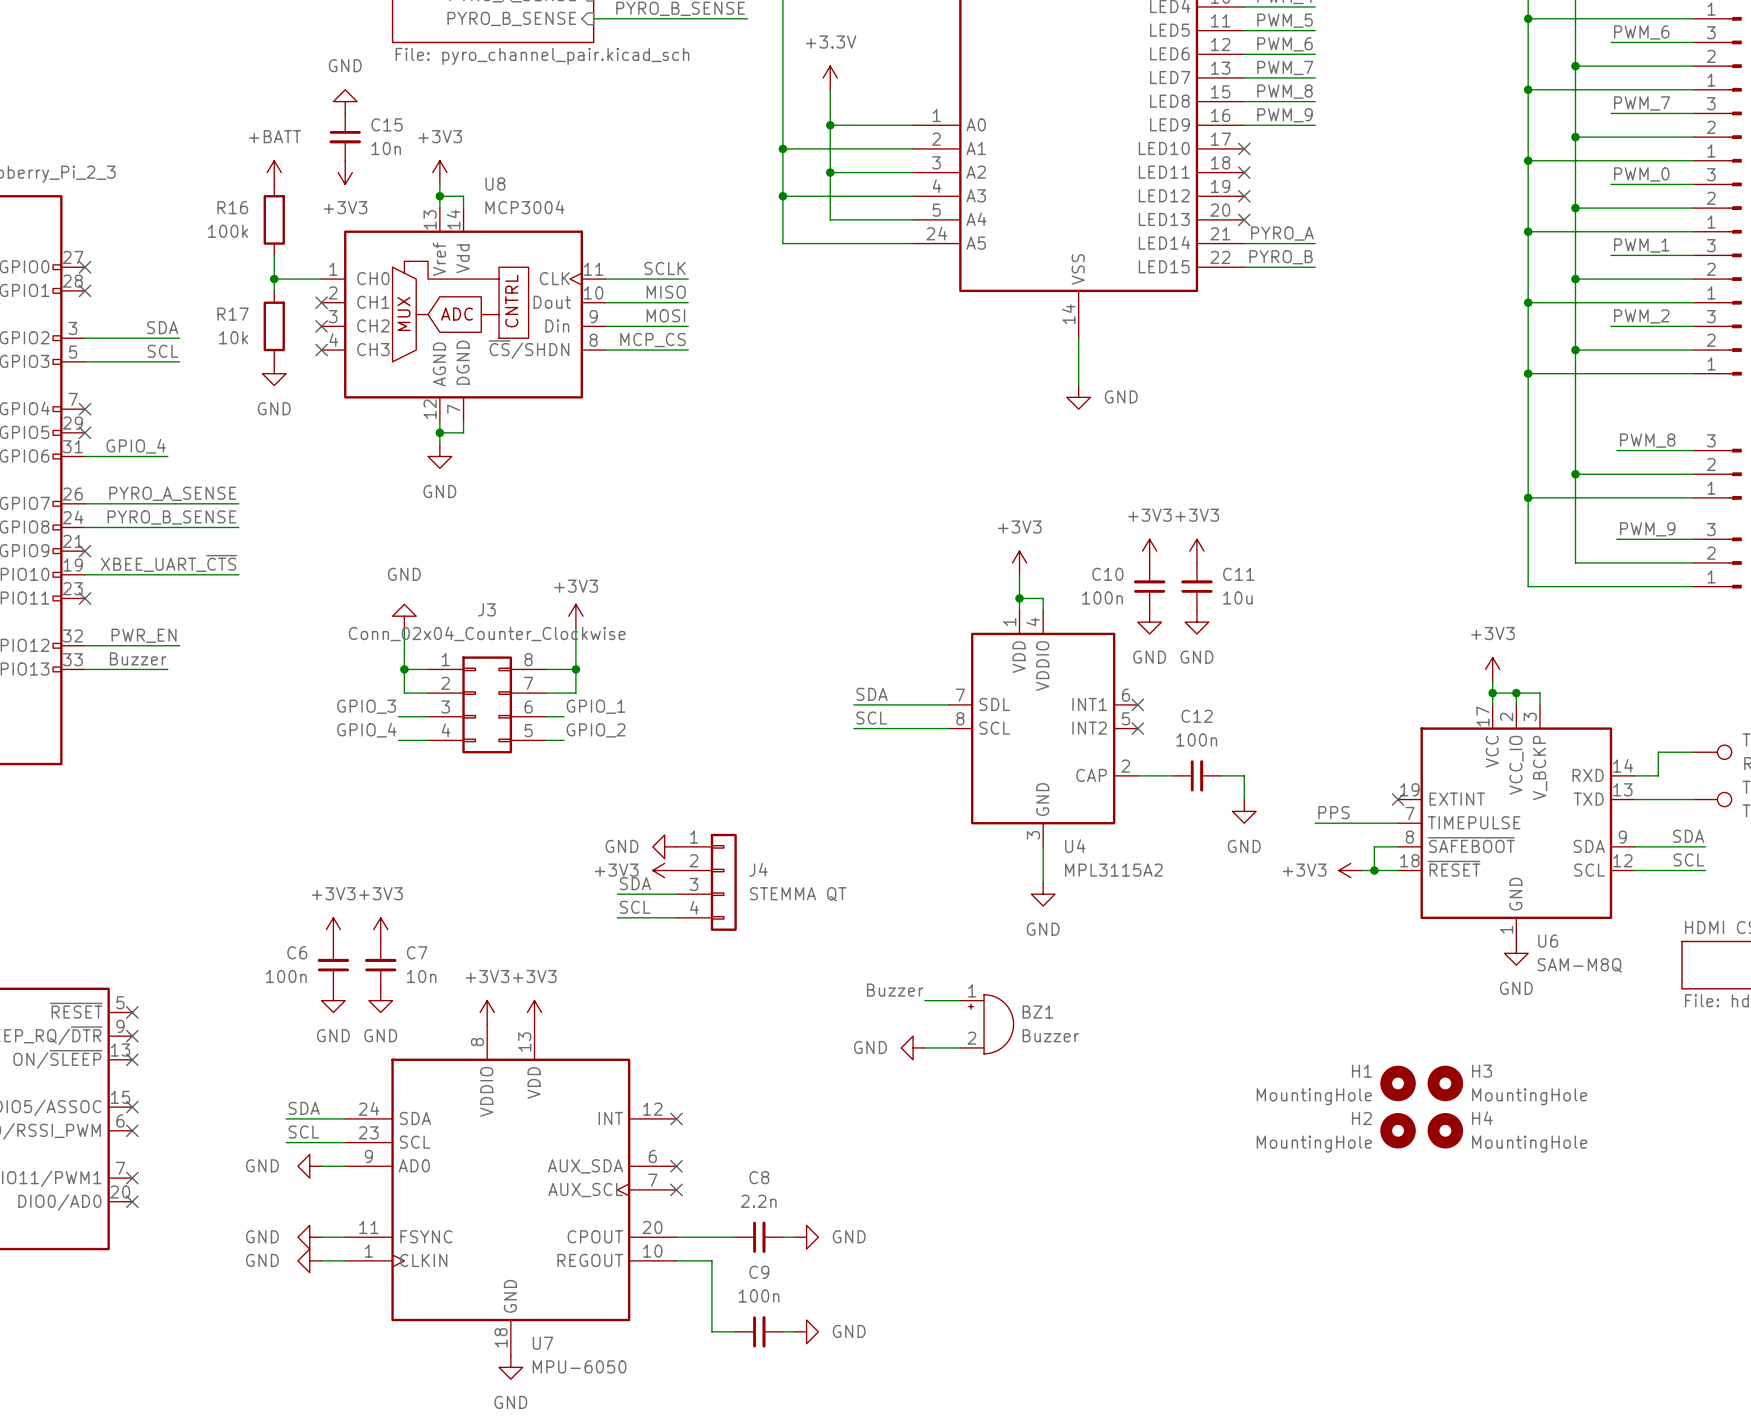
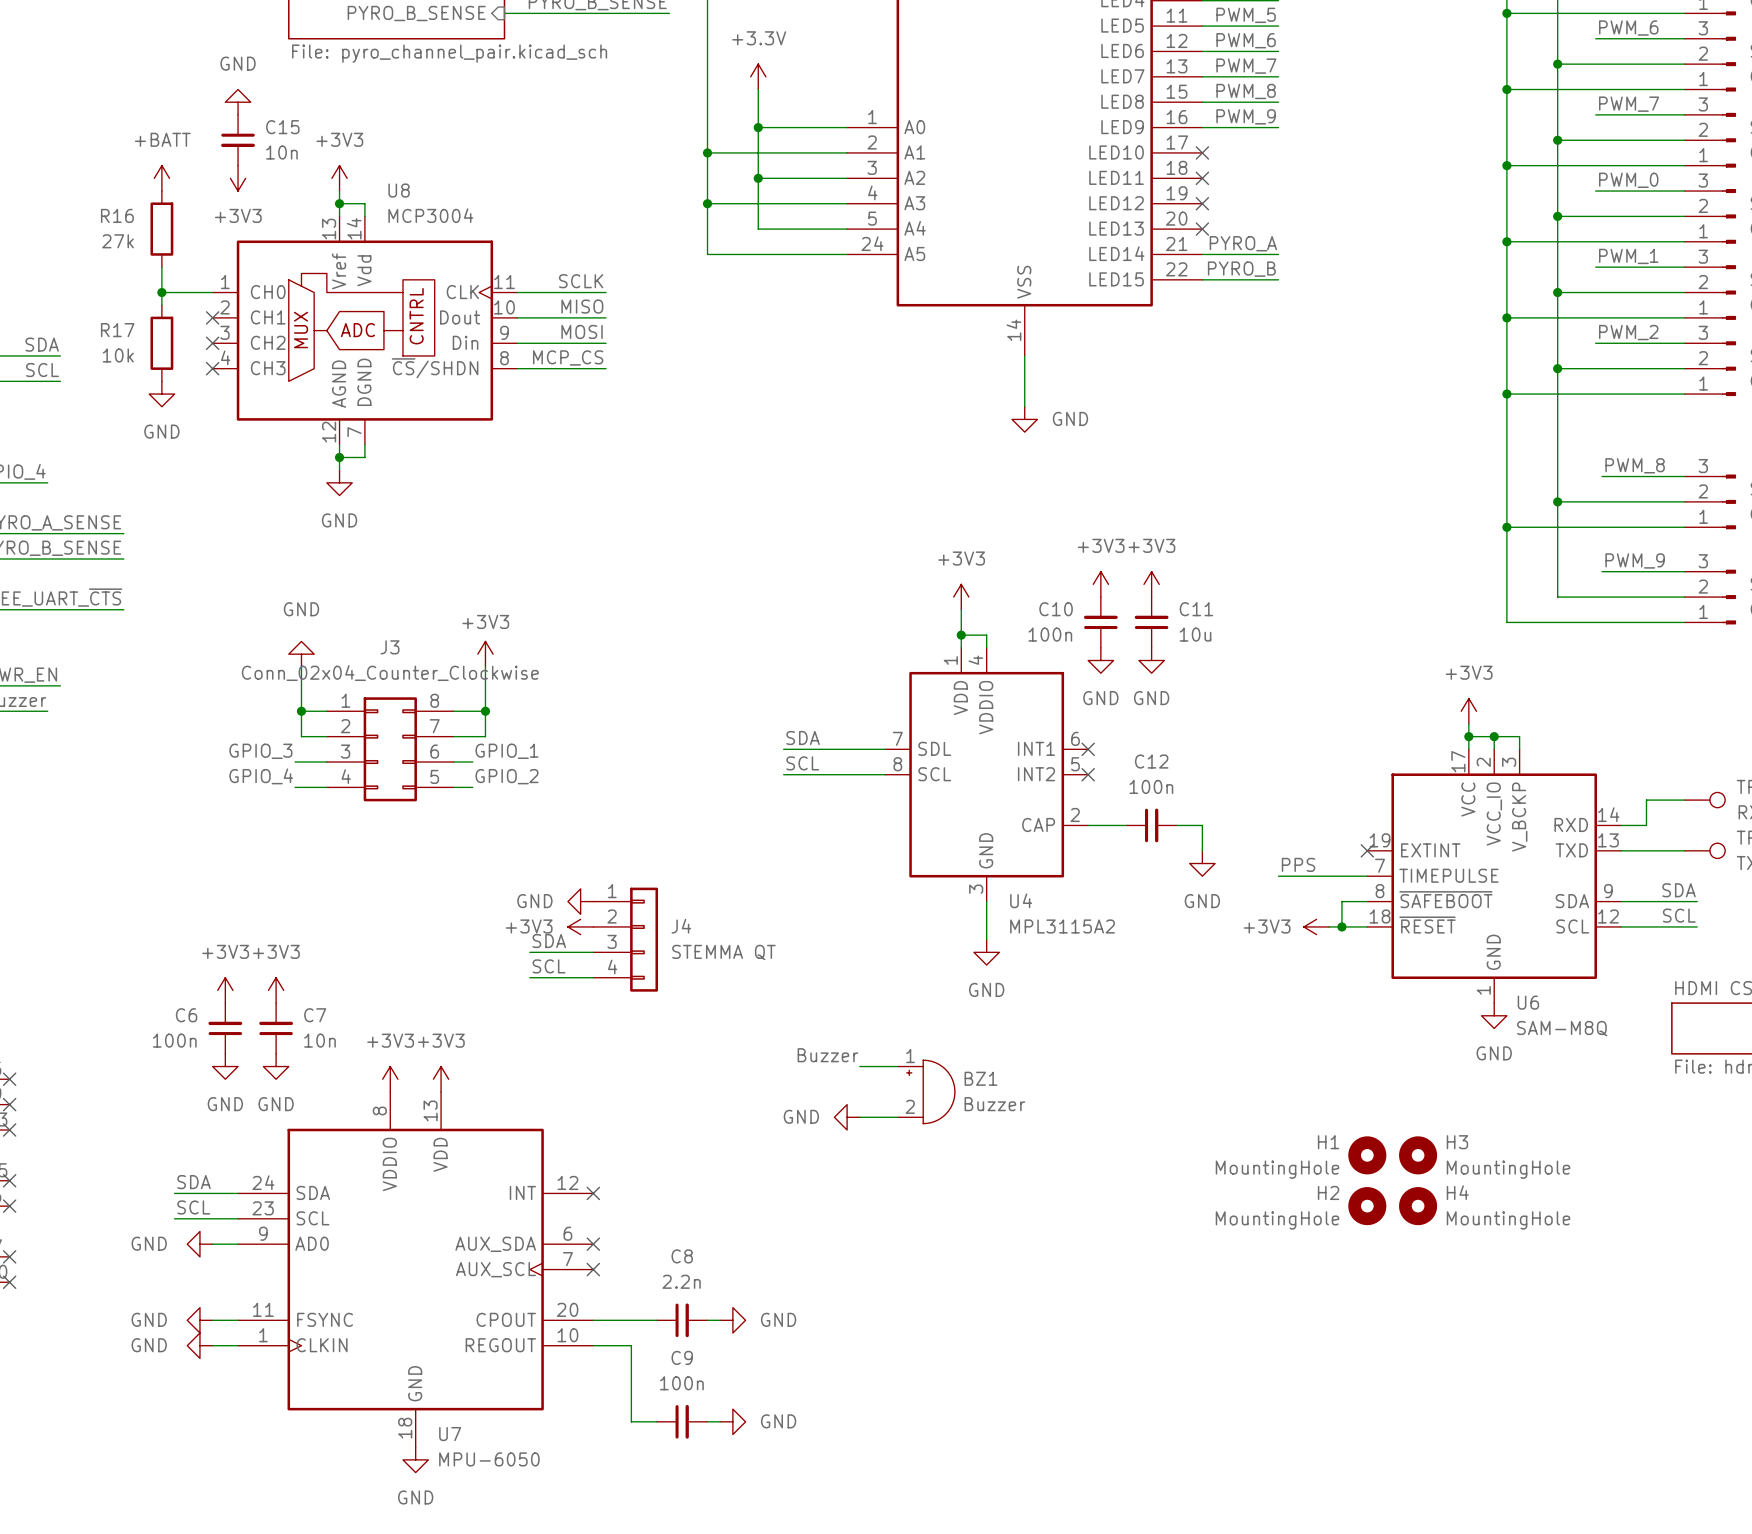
R16 value: 100k (227, 231) -> 27k (117, 241)

